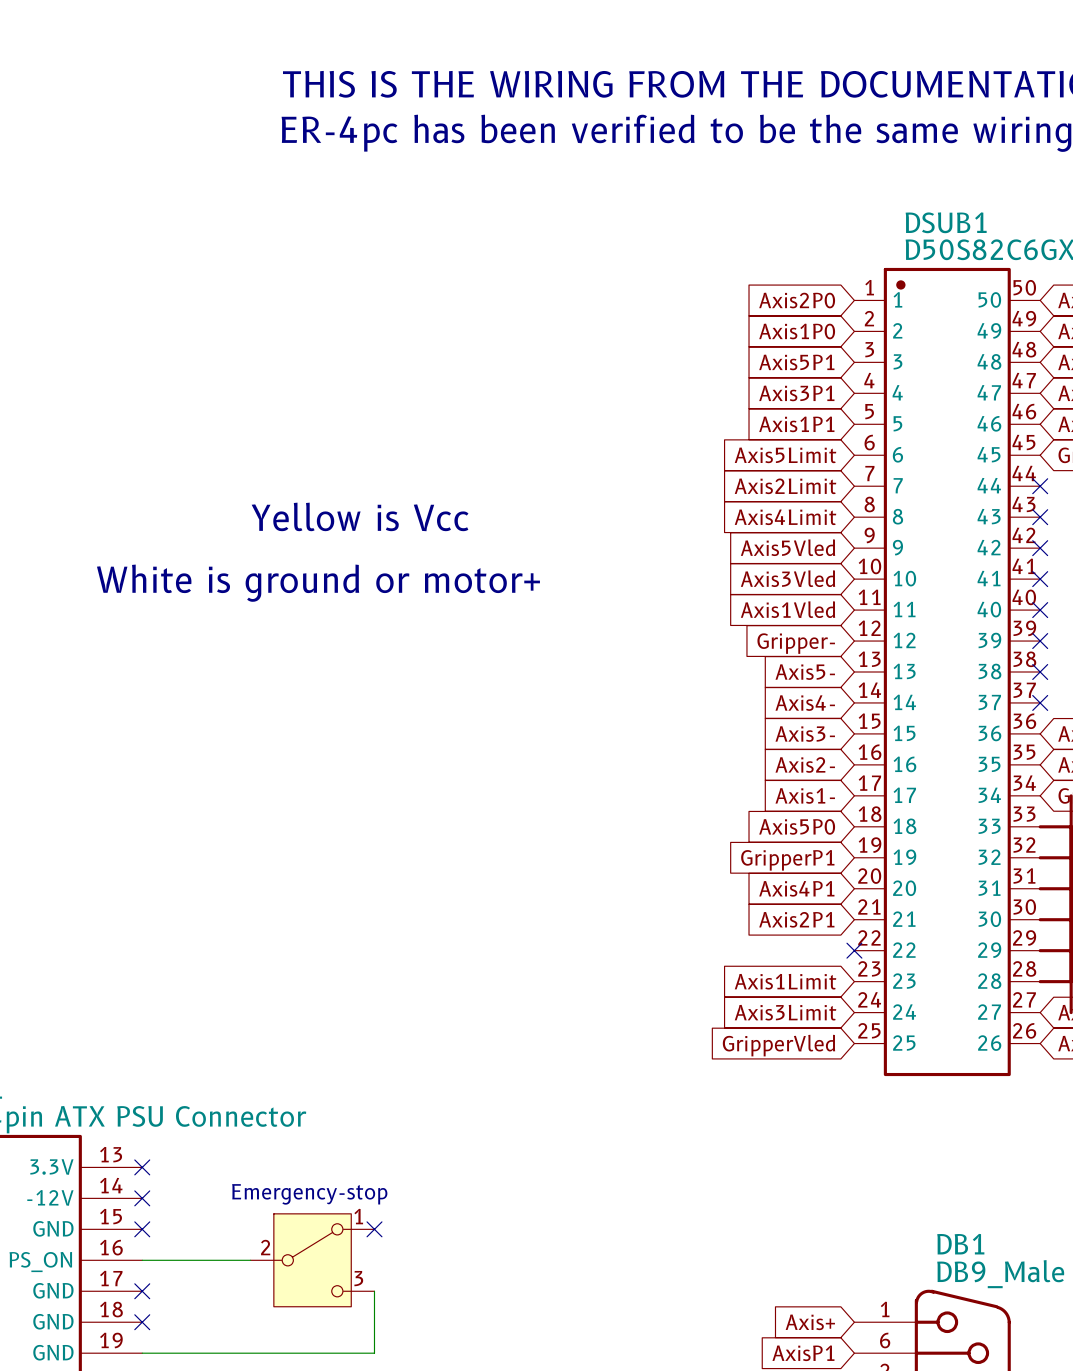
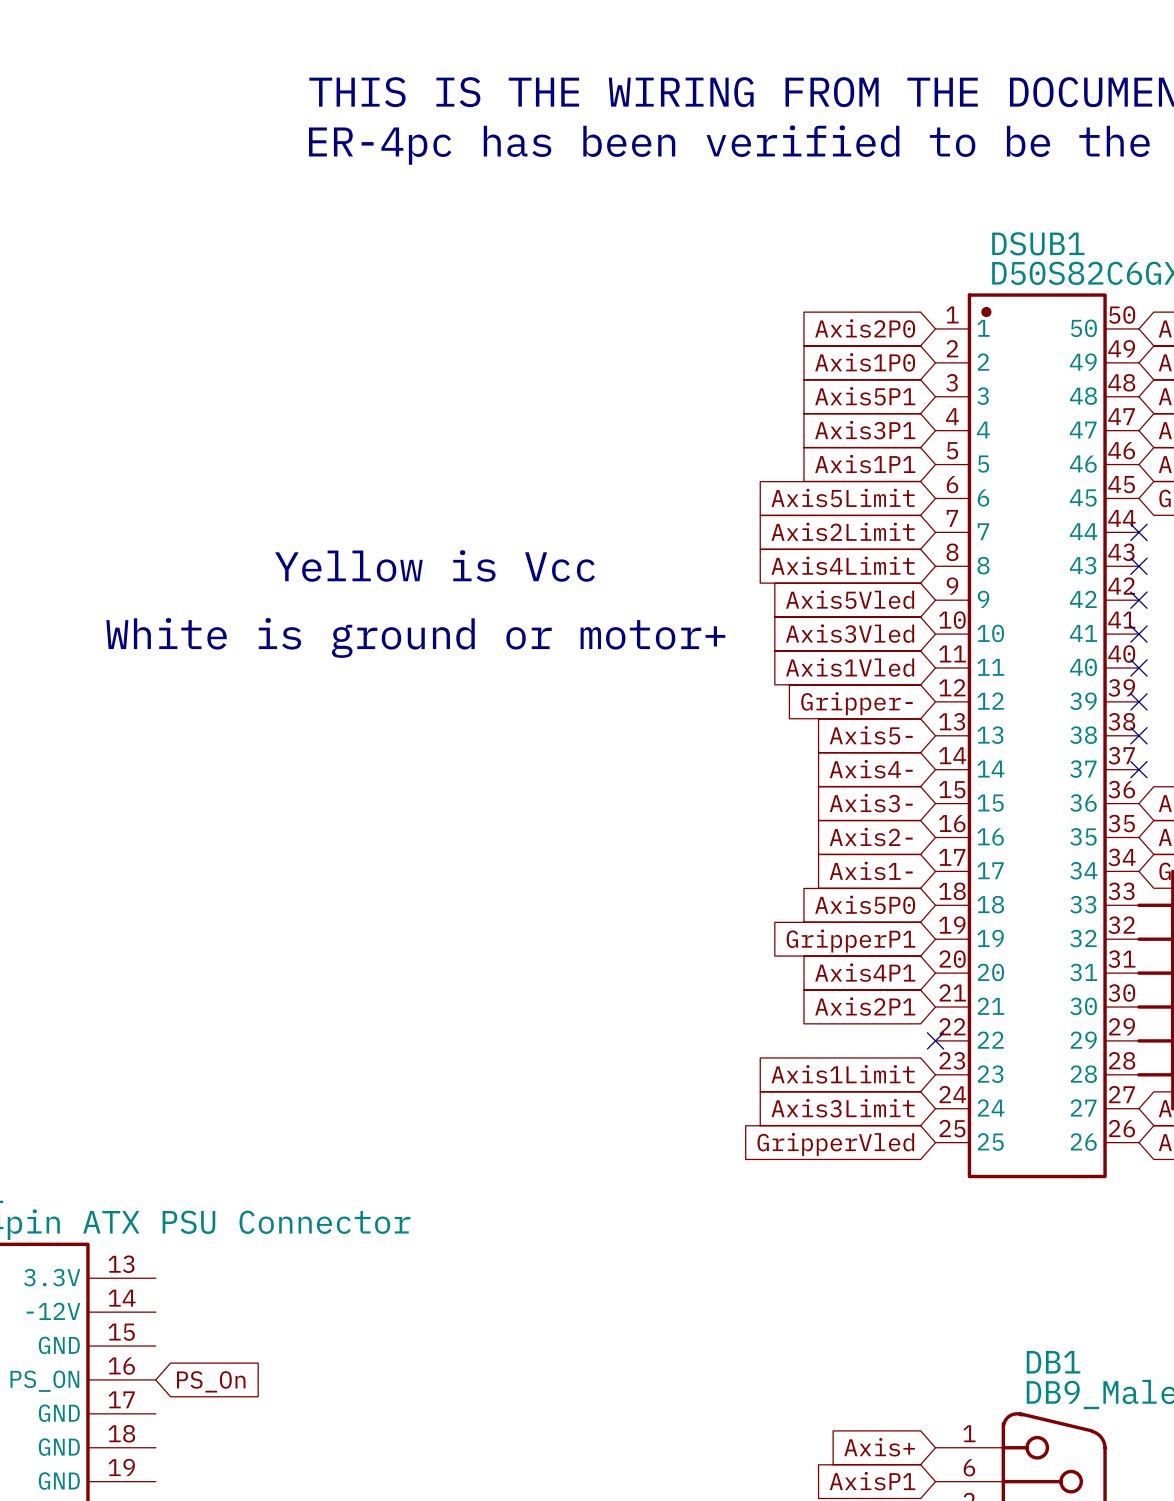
no-connect mark: (142, 1167) -> none
text: Emergency-stop (309, 1194) -> none
no-connect mark: (142, 1198) -> none
no-connect mark: (142, 1229) -> none
no-connect mark: (374, 1229) -> none
wire: (142, 1260) (250, 1260) -> none
part: (312, 1260) -> none
global label: none -> PS_On (211, 1381)
no-connect mark: (142, 1291) -> none
wire: (374, 1291) (374, 1353) (142, 1353) -> none
no-connect mark: (142, 1322) -> none

